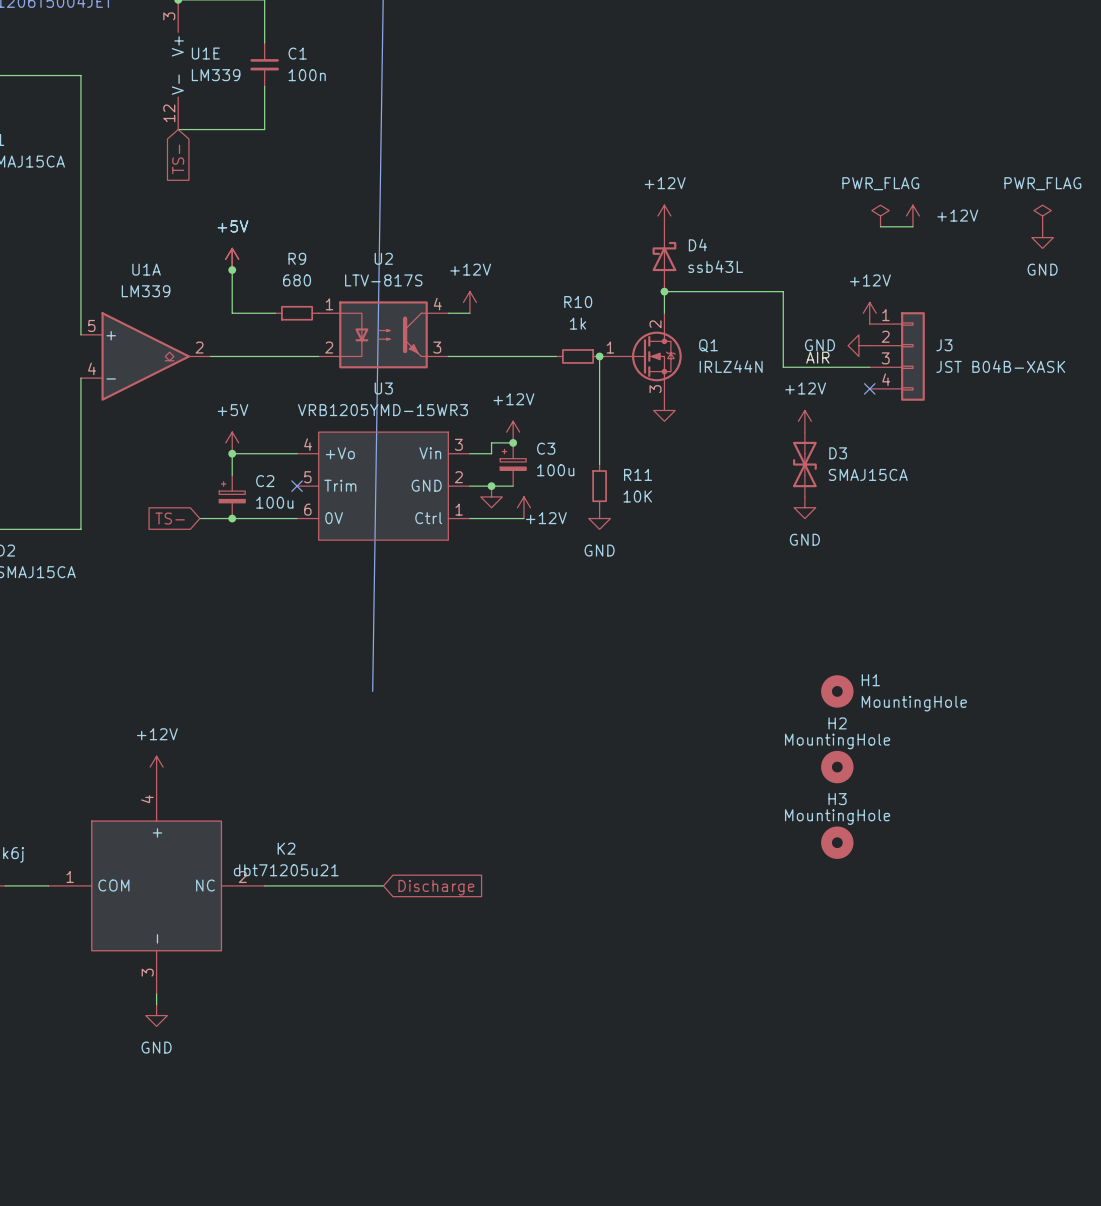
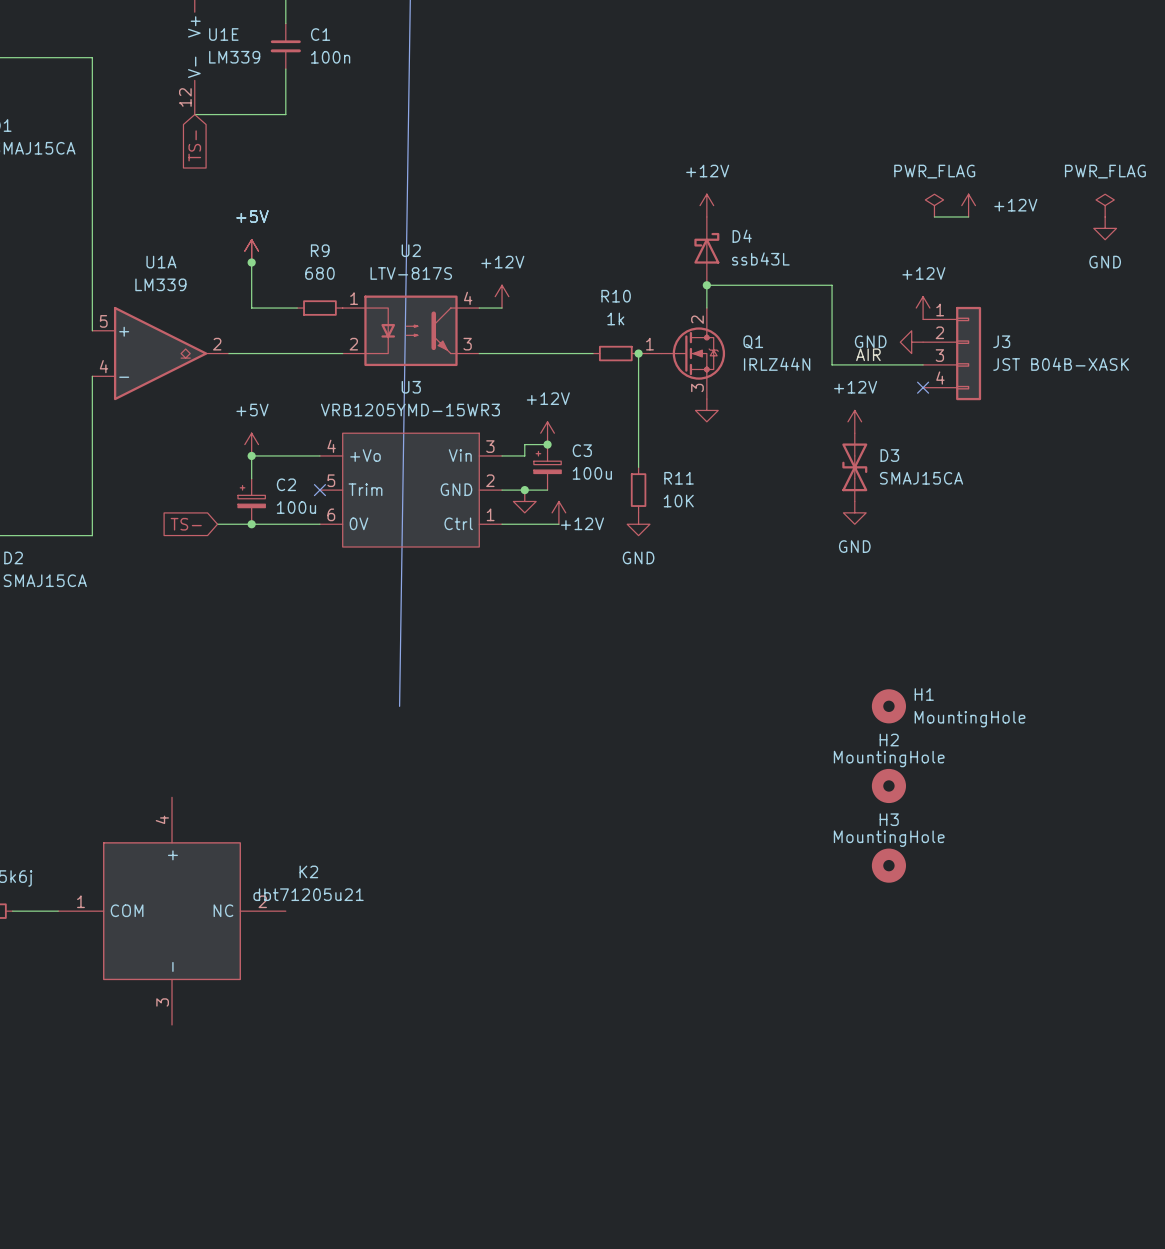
power symbol: +12V (156, 767) -> none
wire: (264, 885) (383, 885) -> none
global label: Discharge (436, 887) -> none
wire: (156, 993) (156, 1004) -> none
power symbol: GND (156, 1015) -> none

